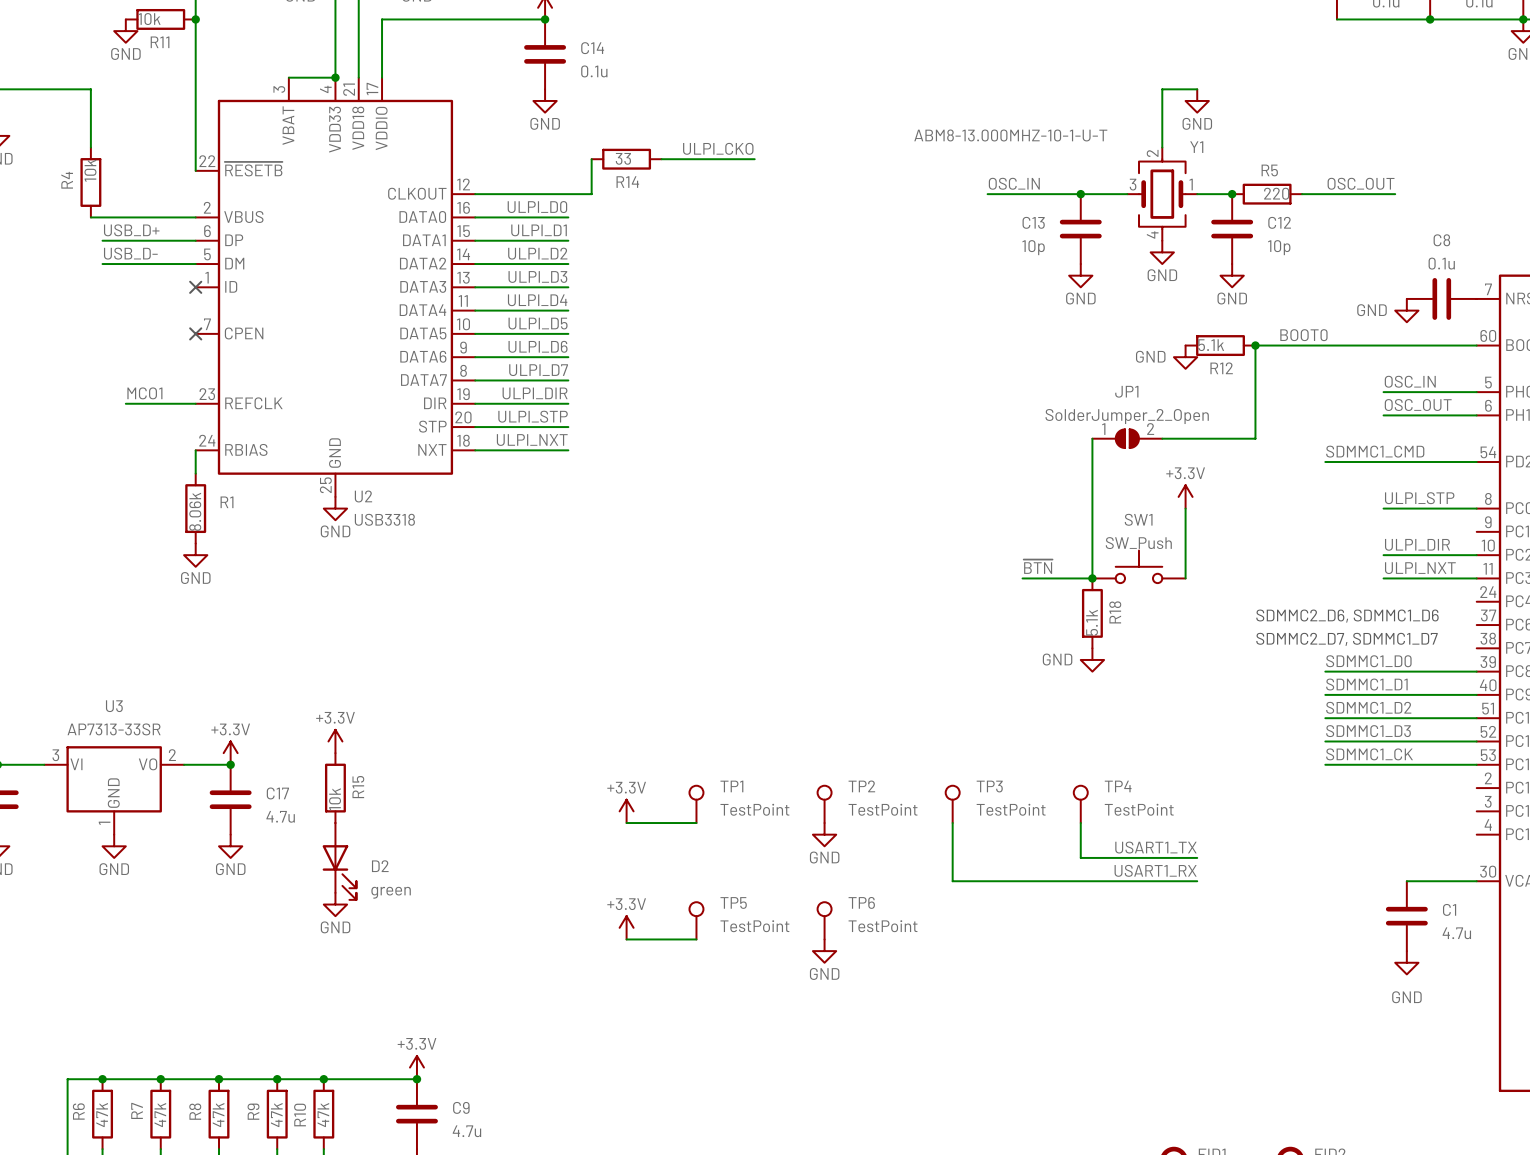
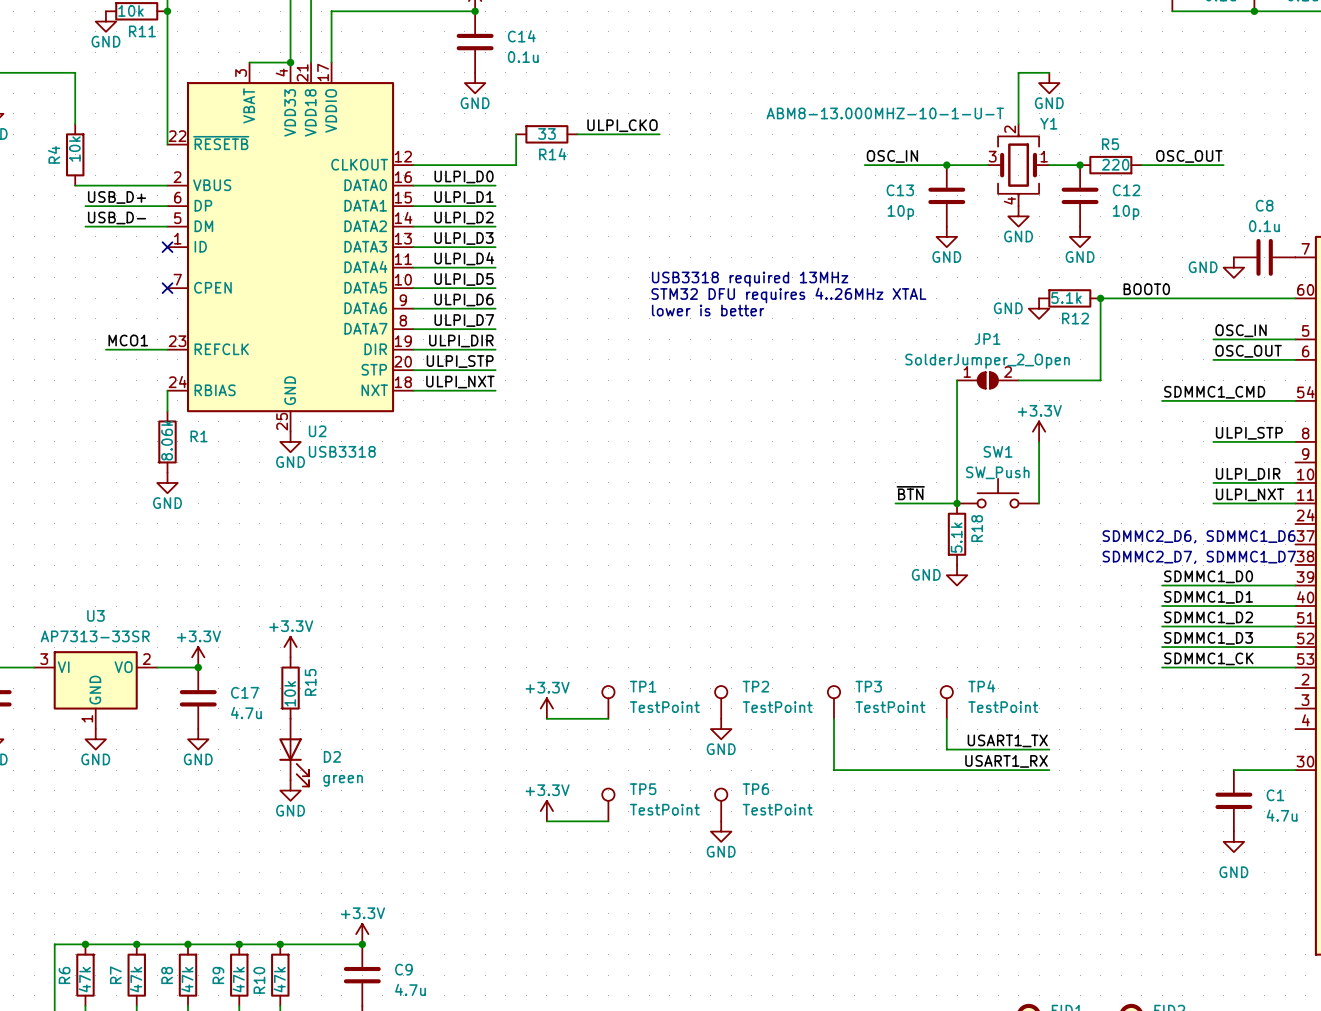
text: none -> USB3318 required 13MHz (750, 279)
text: none -> STM32 DFU requires 4..26MHz XTAL (788, 295)
text: none -> lower is better (708, 310)

